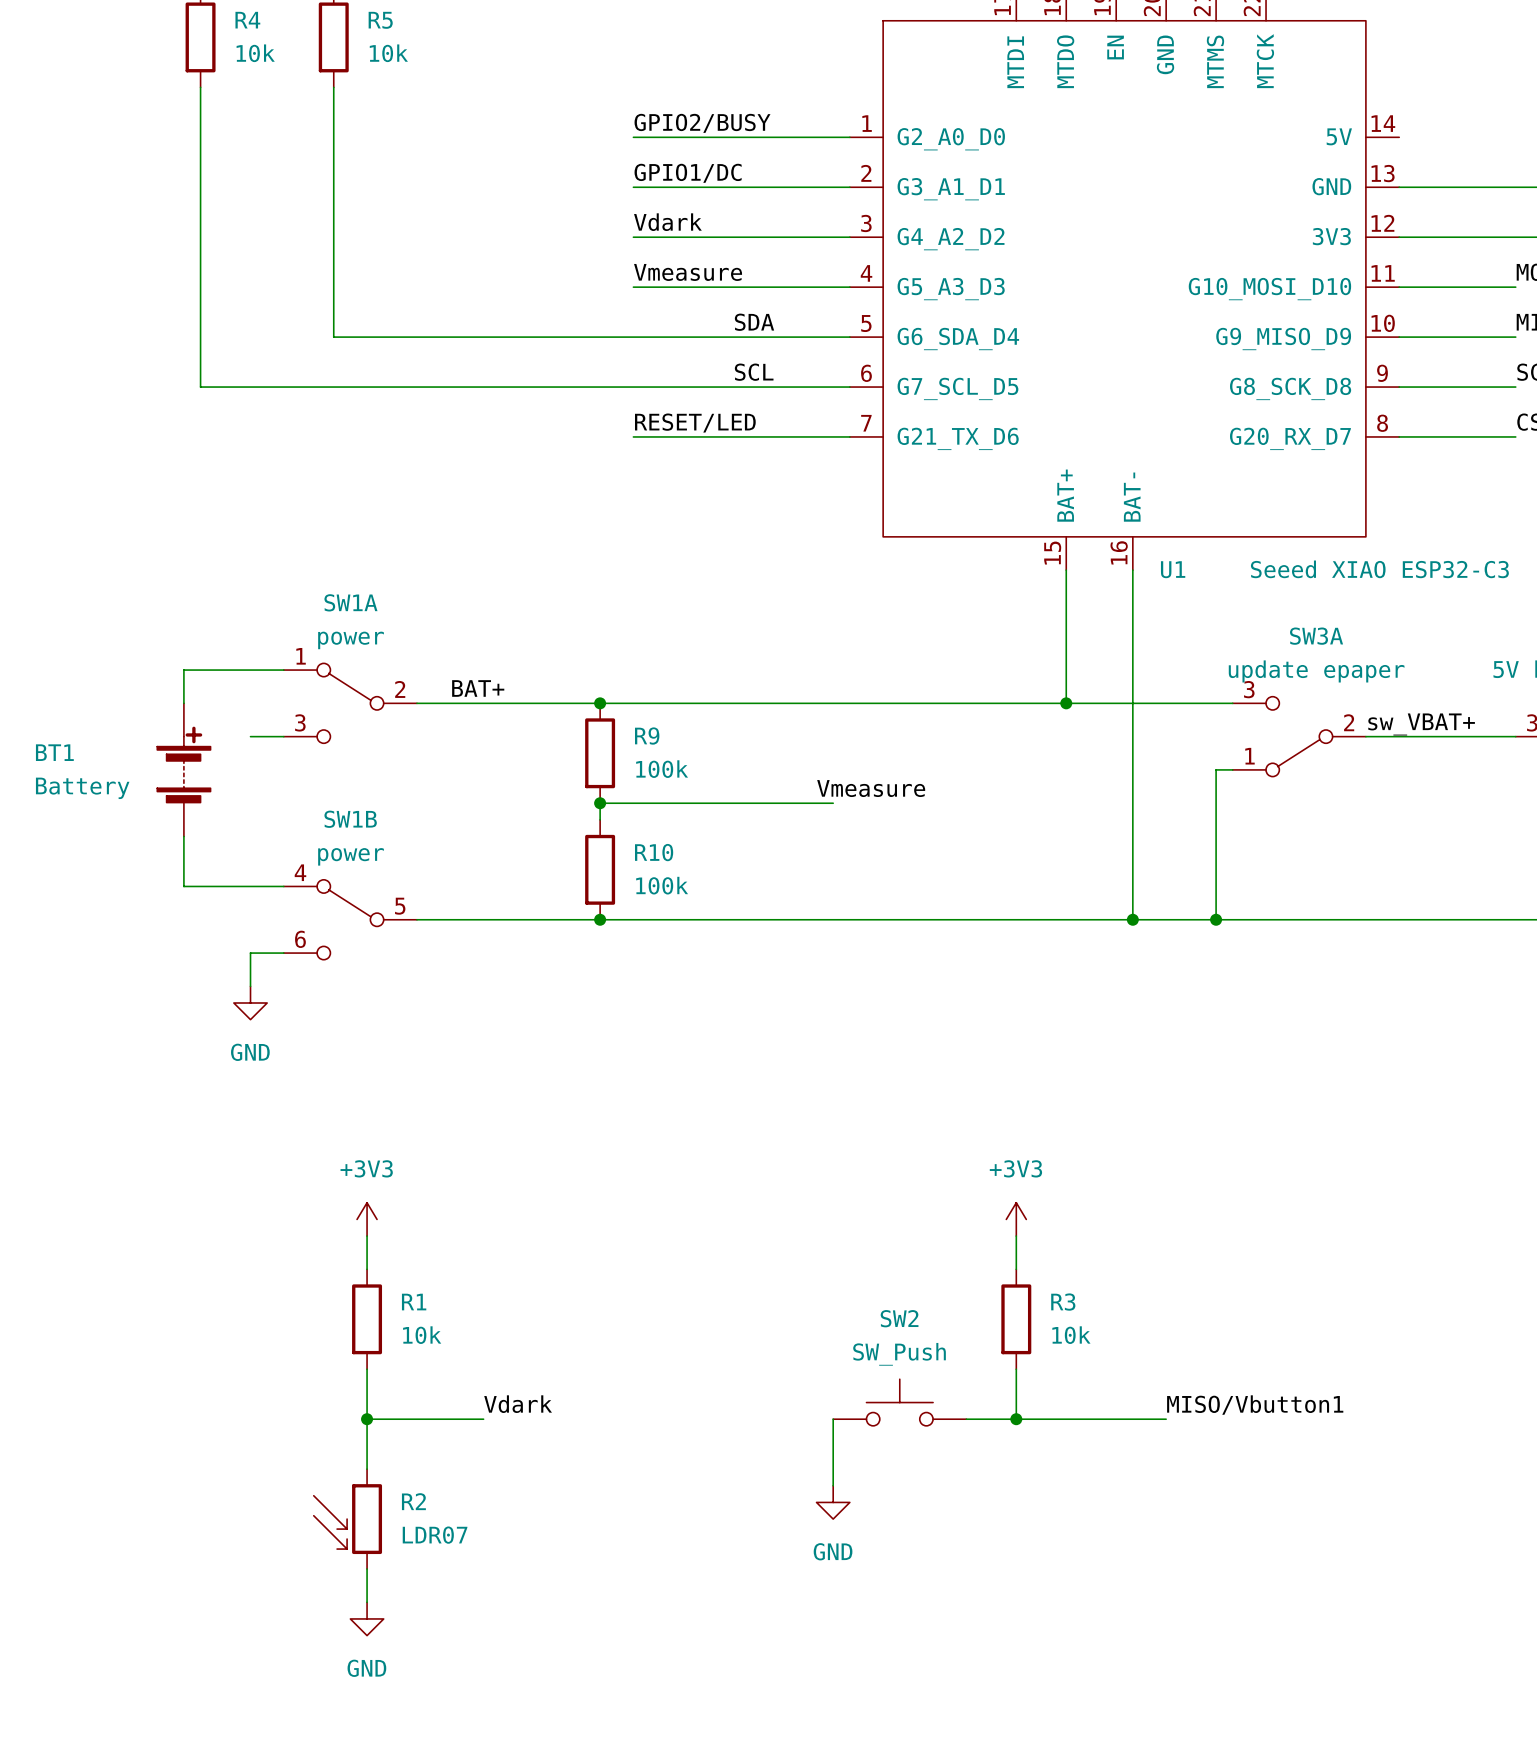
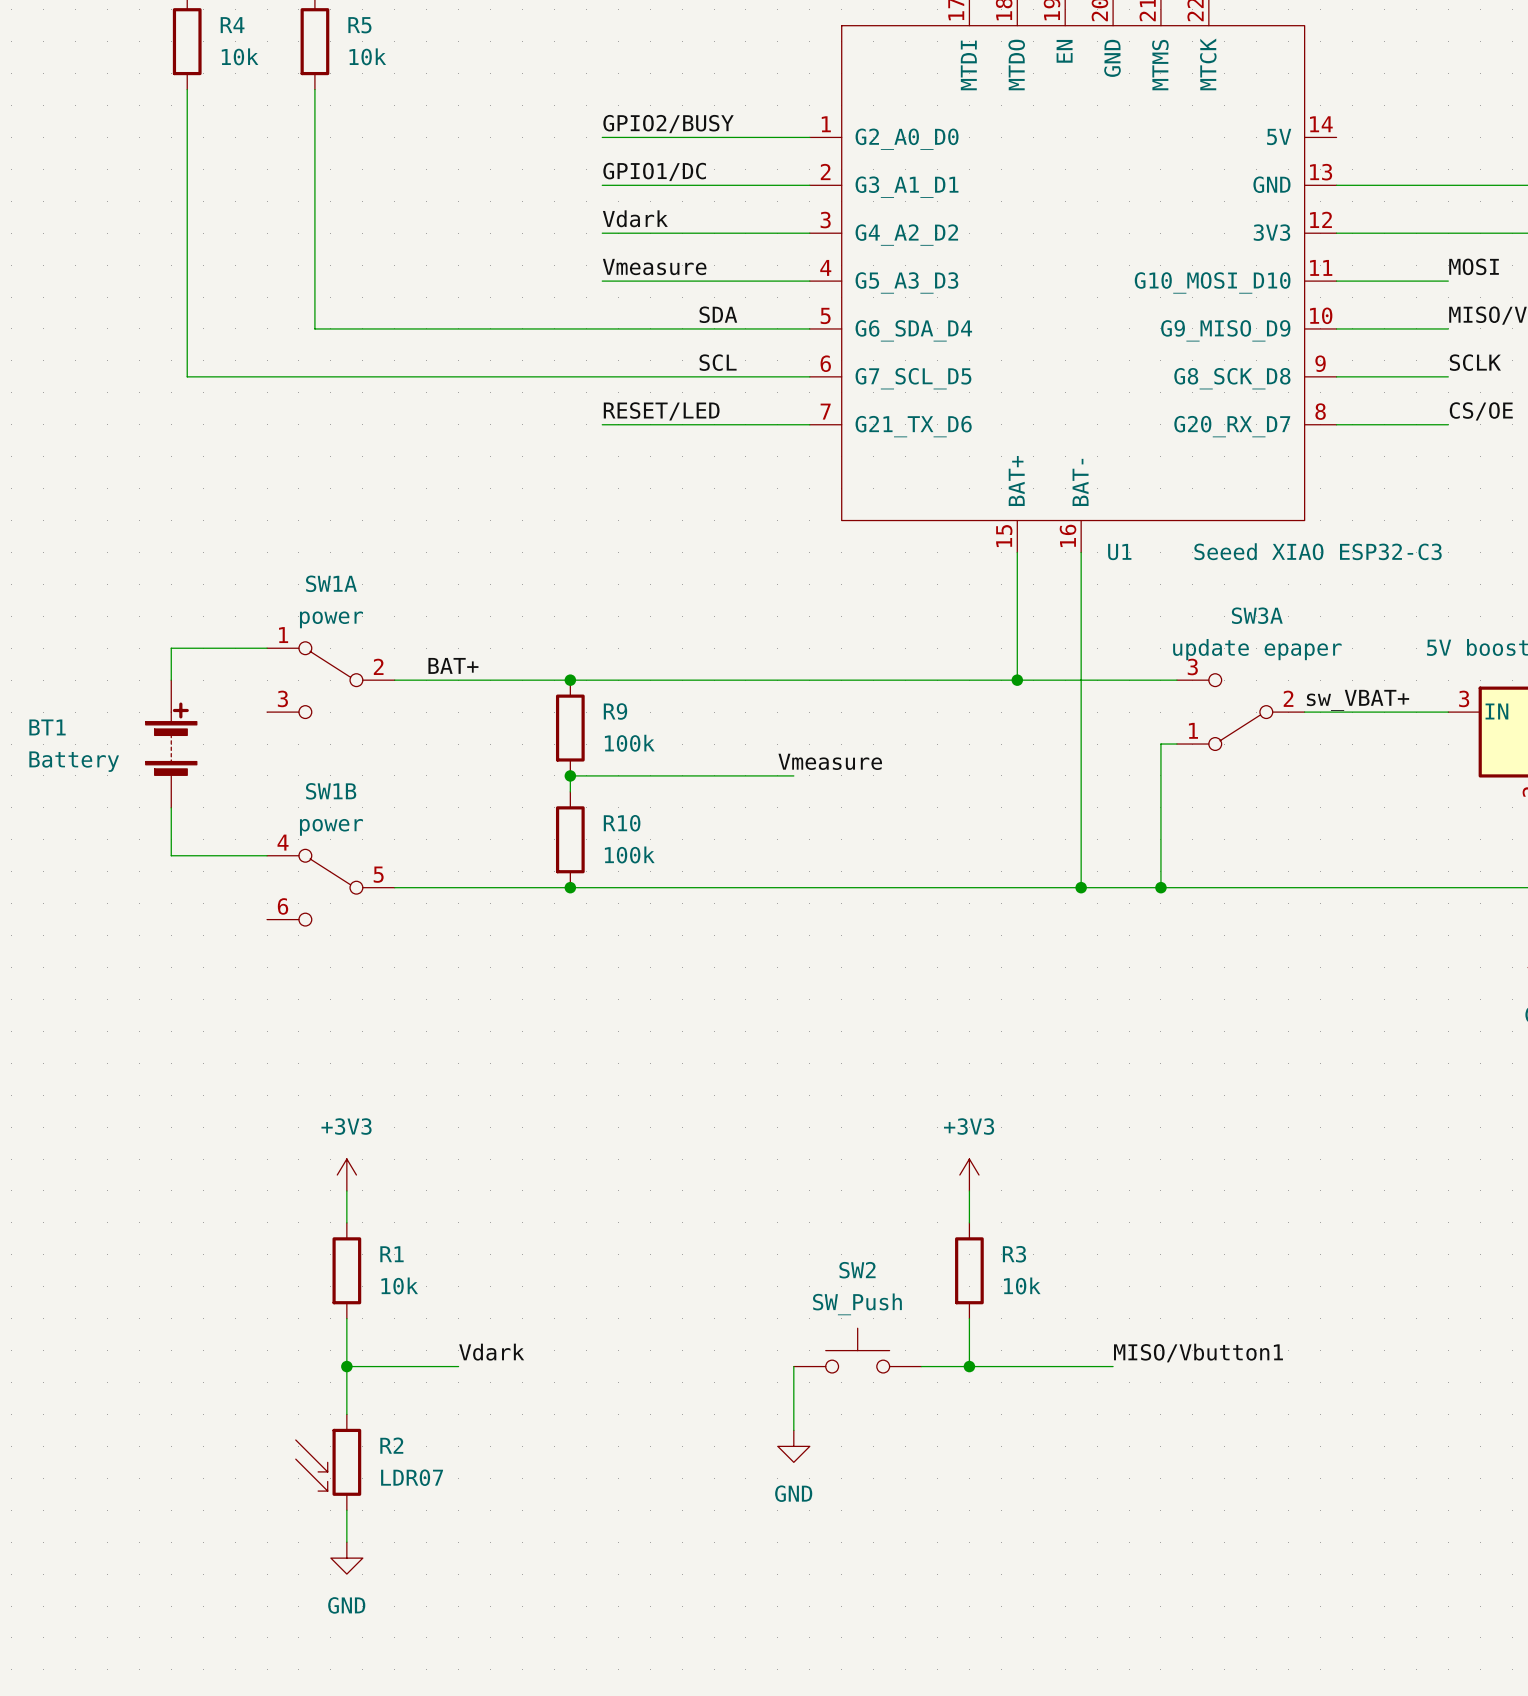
wire: (250, 736) (283, 736) -> none
wire: (283, 953) (250, 953) (250, 986) -> none
power symbol: GND (250, 1003) -> none

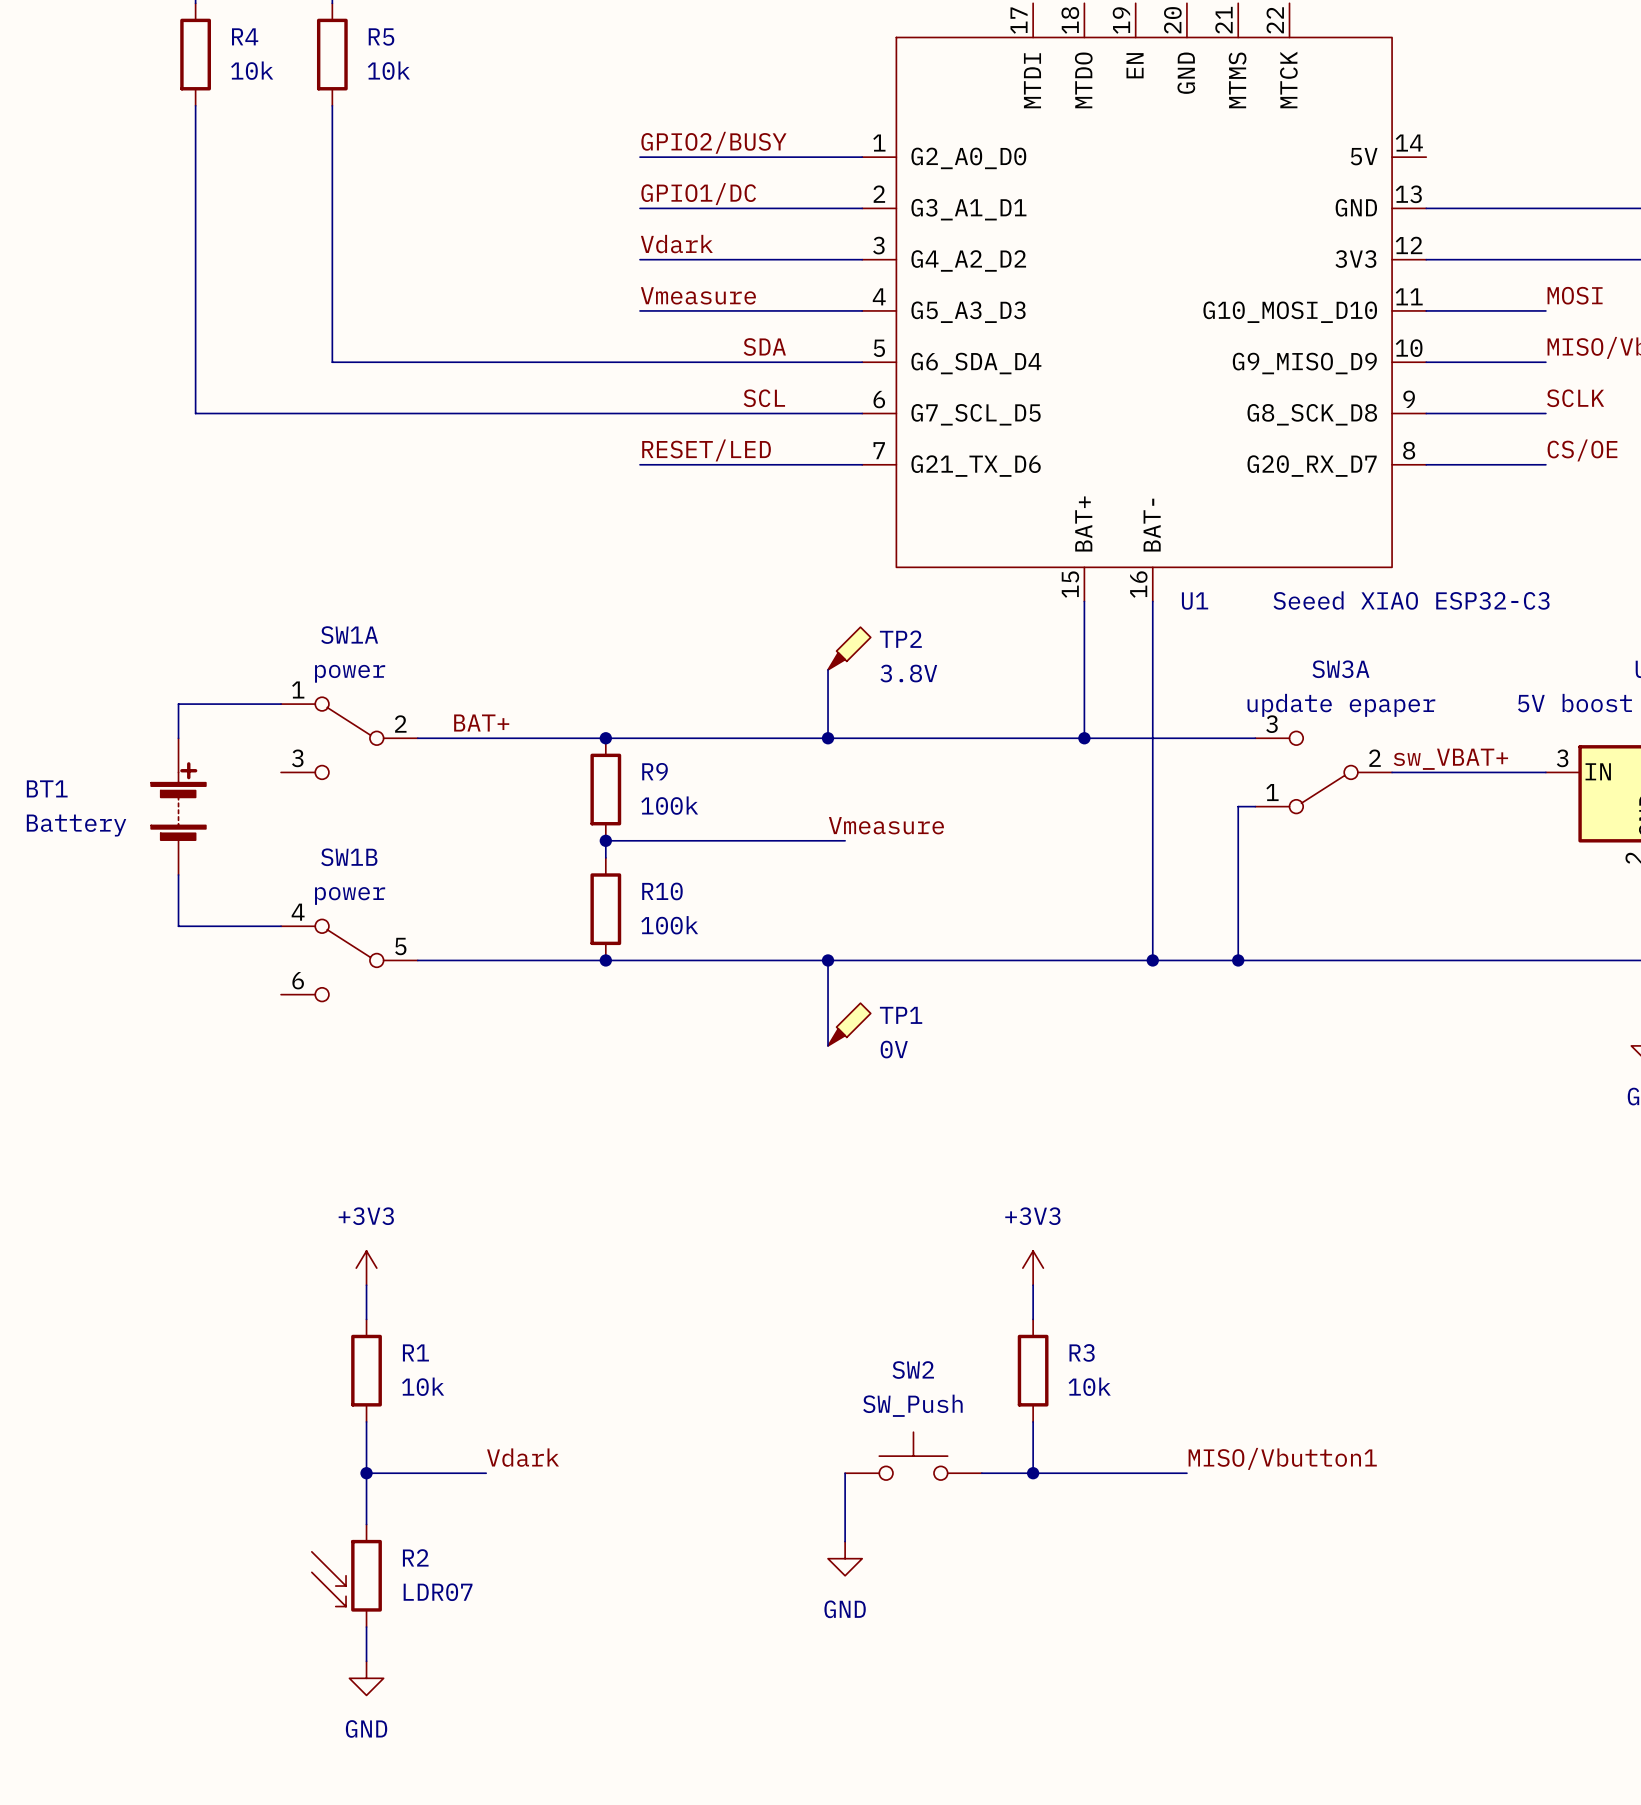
TP2: none -> 3.8V (849, 648)
wire: none -> (828, 669) (828, 738)
junction: none -> (828, 738)
wire: none -> (828, 960) (828, 1045)
junction: none -> (828, 960)
TP1: none -> 0V (849, 1024)

